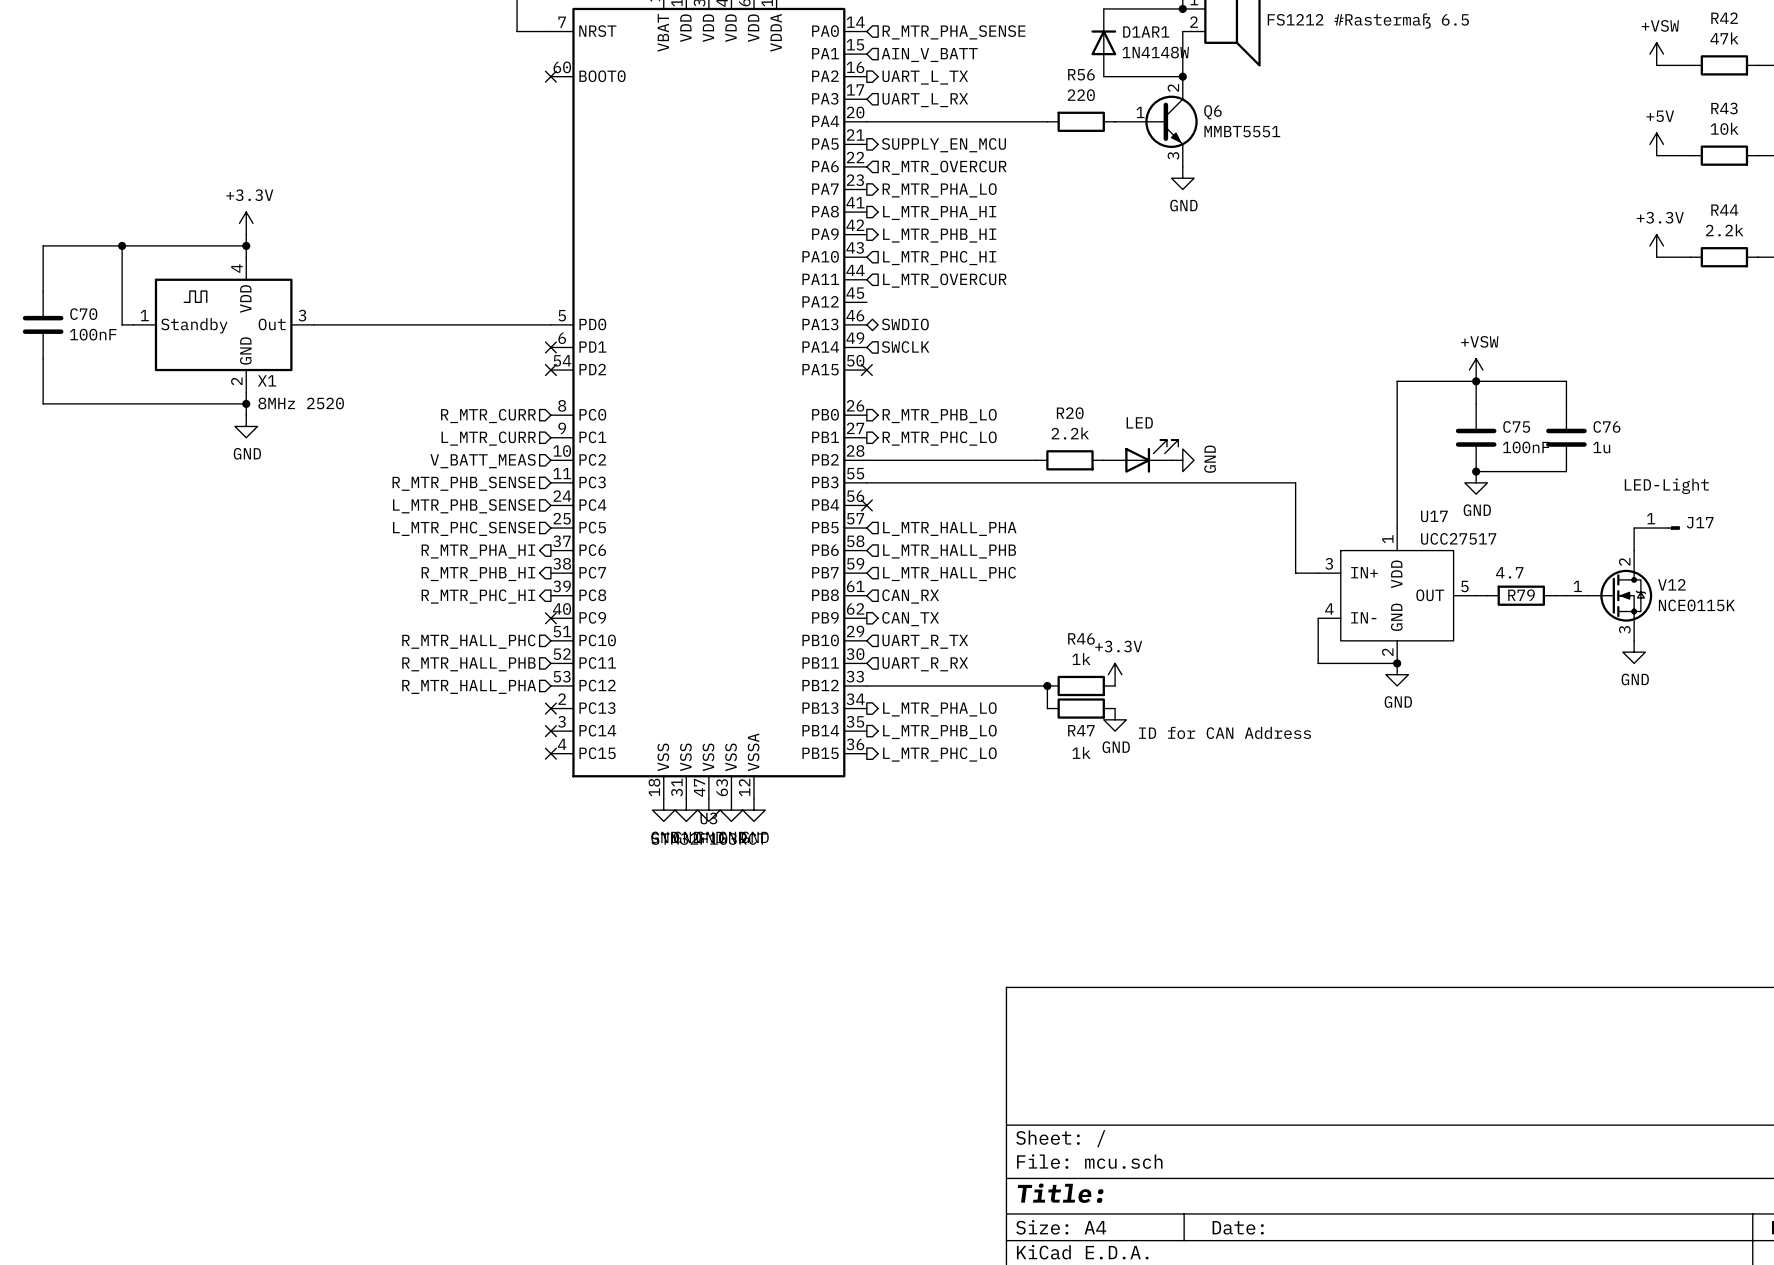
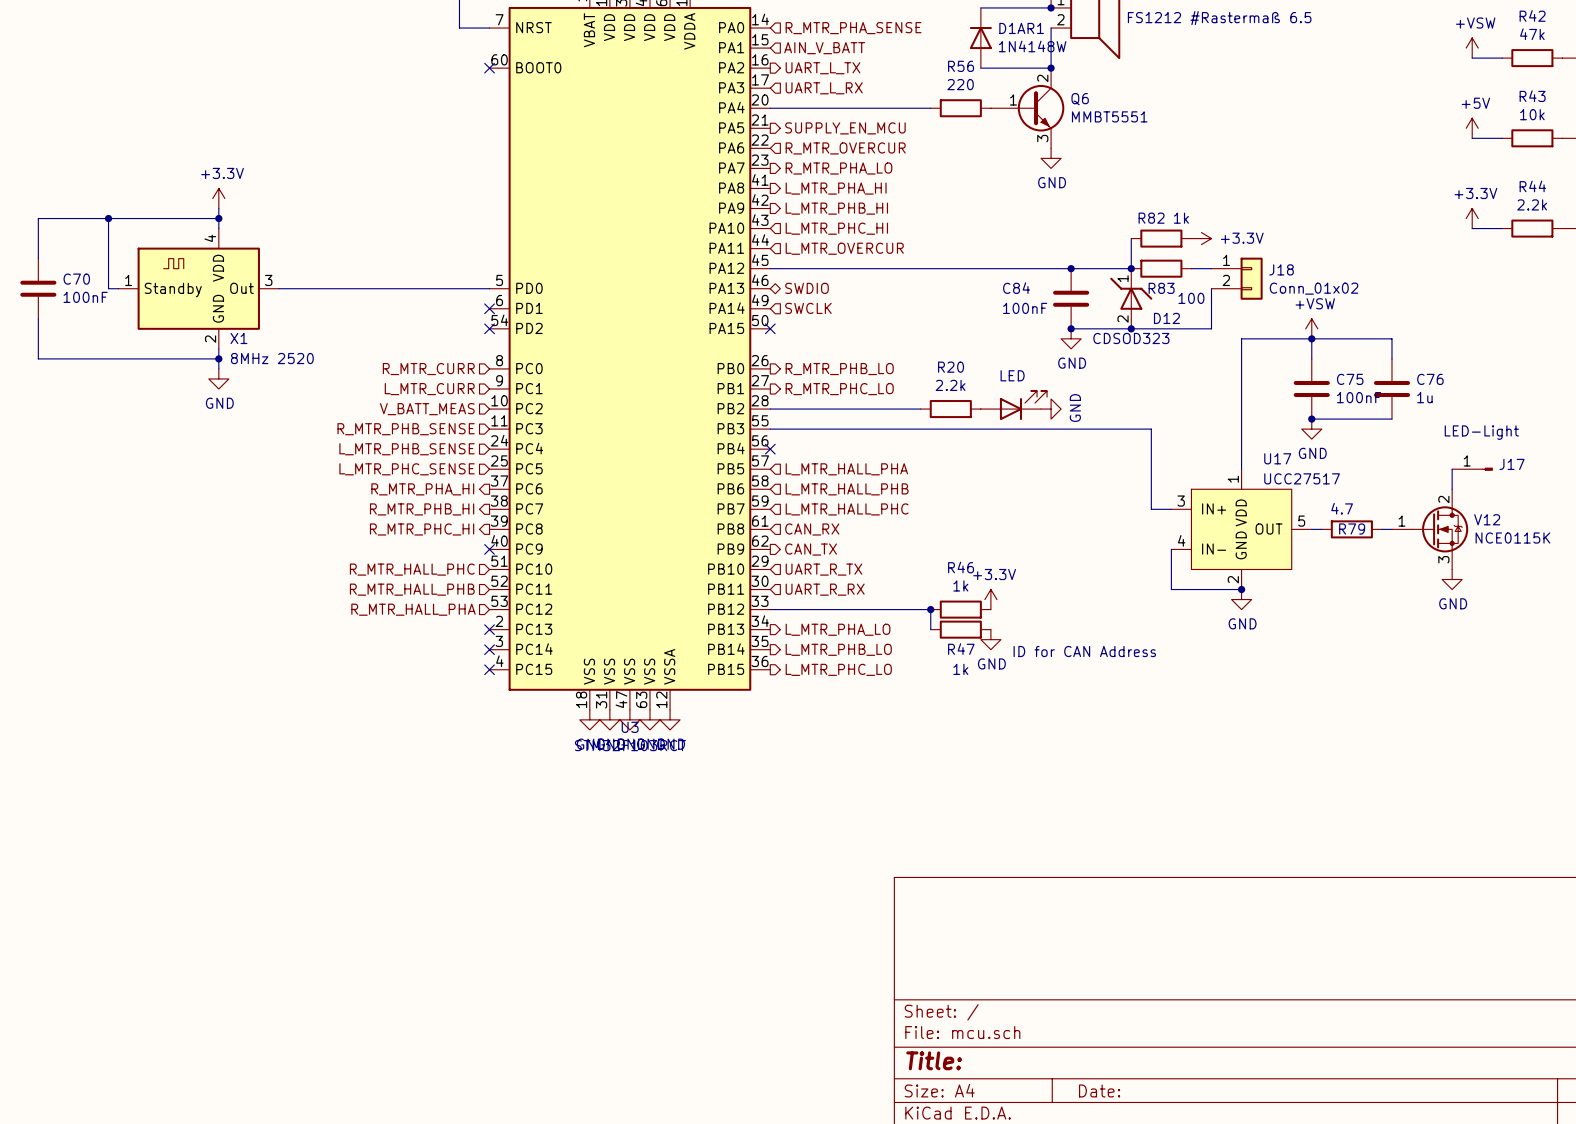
wire: none -> (1131, 238) (1131, 268) (770, 268)
R82: none -> 1k (1161, 238)
power symbol: none -> +3.3V (1201, 238)
junction: none -> (1071, 268)
junction: none -> (1131, 268)
R83: none -> 100 (1161, 268)
wire: none -> (1191, 268) (1211, 268)
J18: none -> Conn_01x02 (1237, 278)
wire: none -> (1211, 288) (1211, 328) (1071, 328)
C84: none -> 100nF (1071, 298)
D12: none -> CDSOD323 (1131, 298)
junction: none -> (1071, 328)
junction: none -> (1131, 328)
power symbol: none -> GND (1071, 338)

